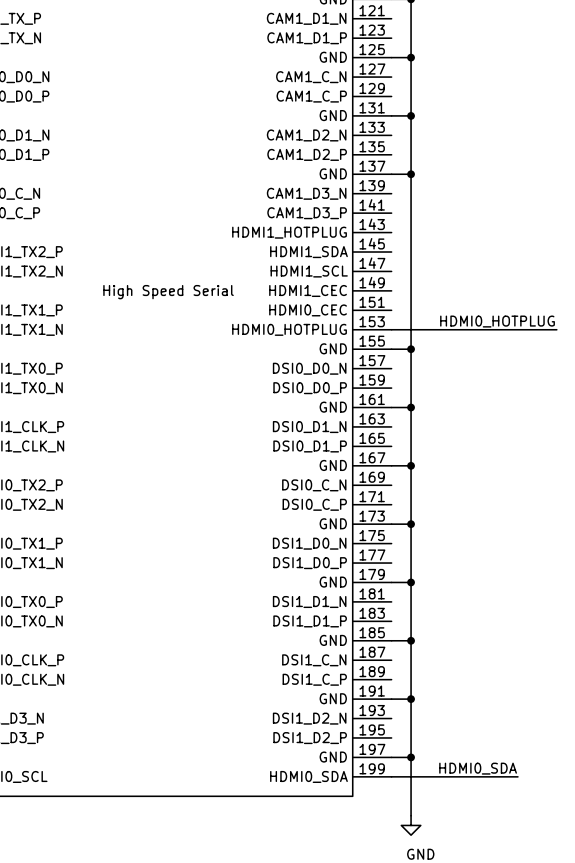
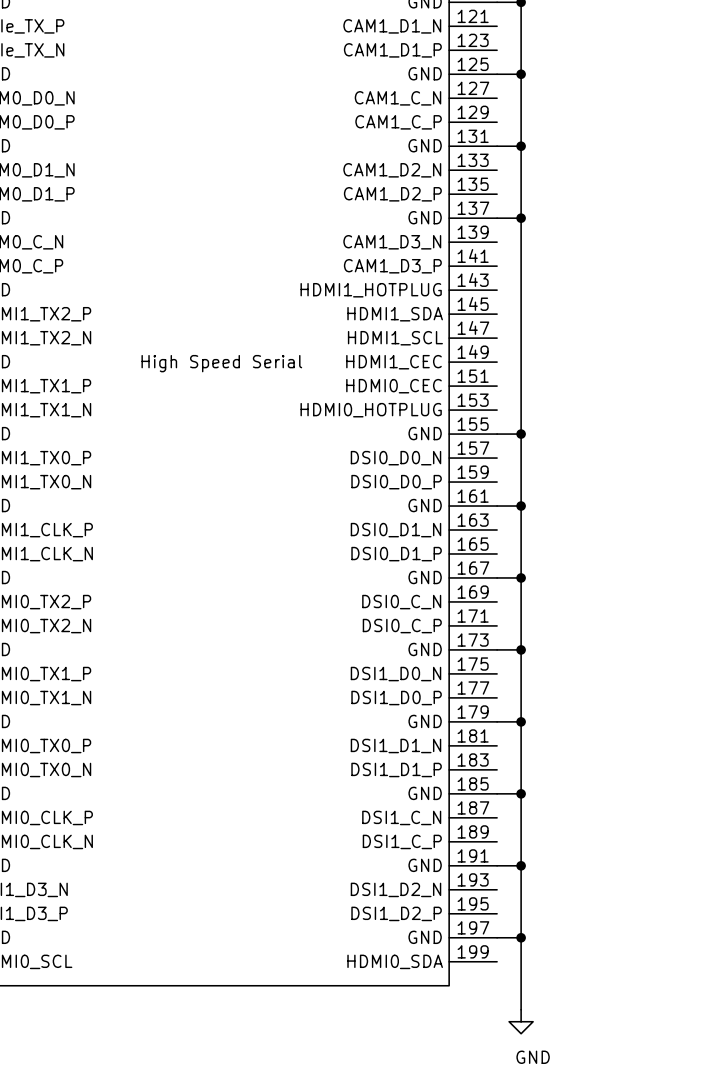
label: HDMI0_HOTPLUG (497, 321) -> none
wire: (391, 329) (556, 329) -> none
label: HDMI0_SDA (478, 768) -> none
wire: (391, 776) (517, 776) -> none

